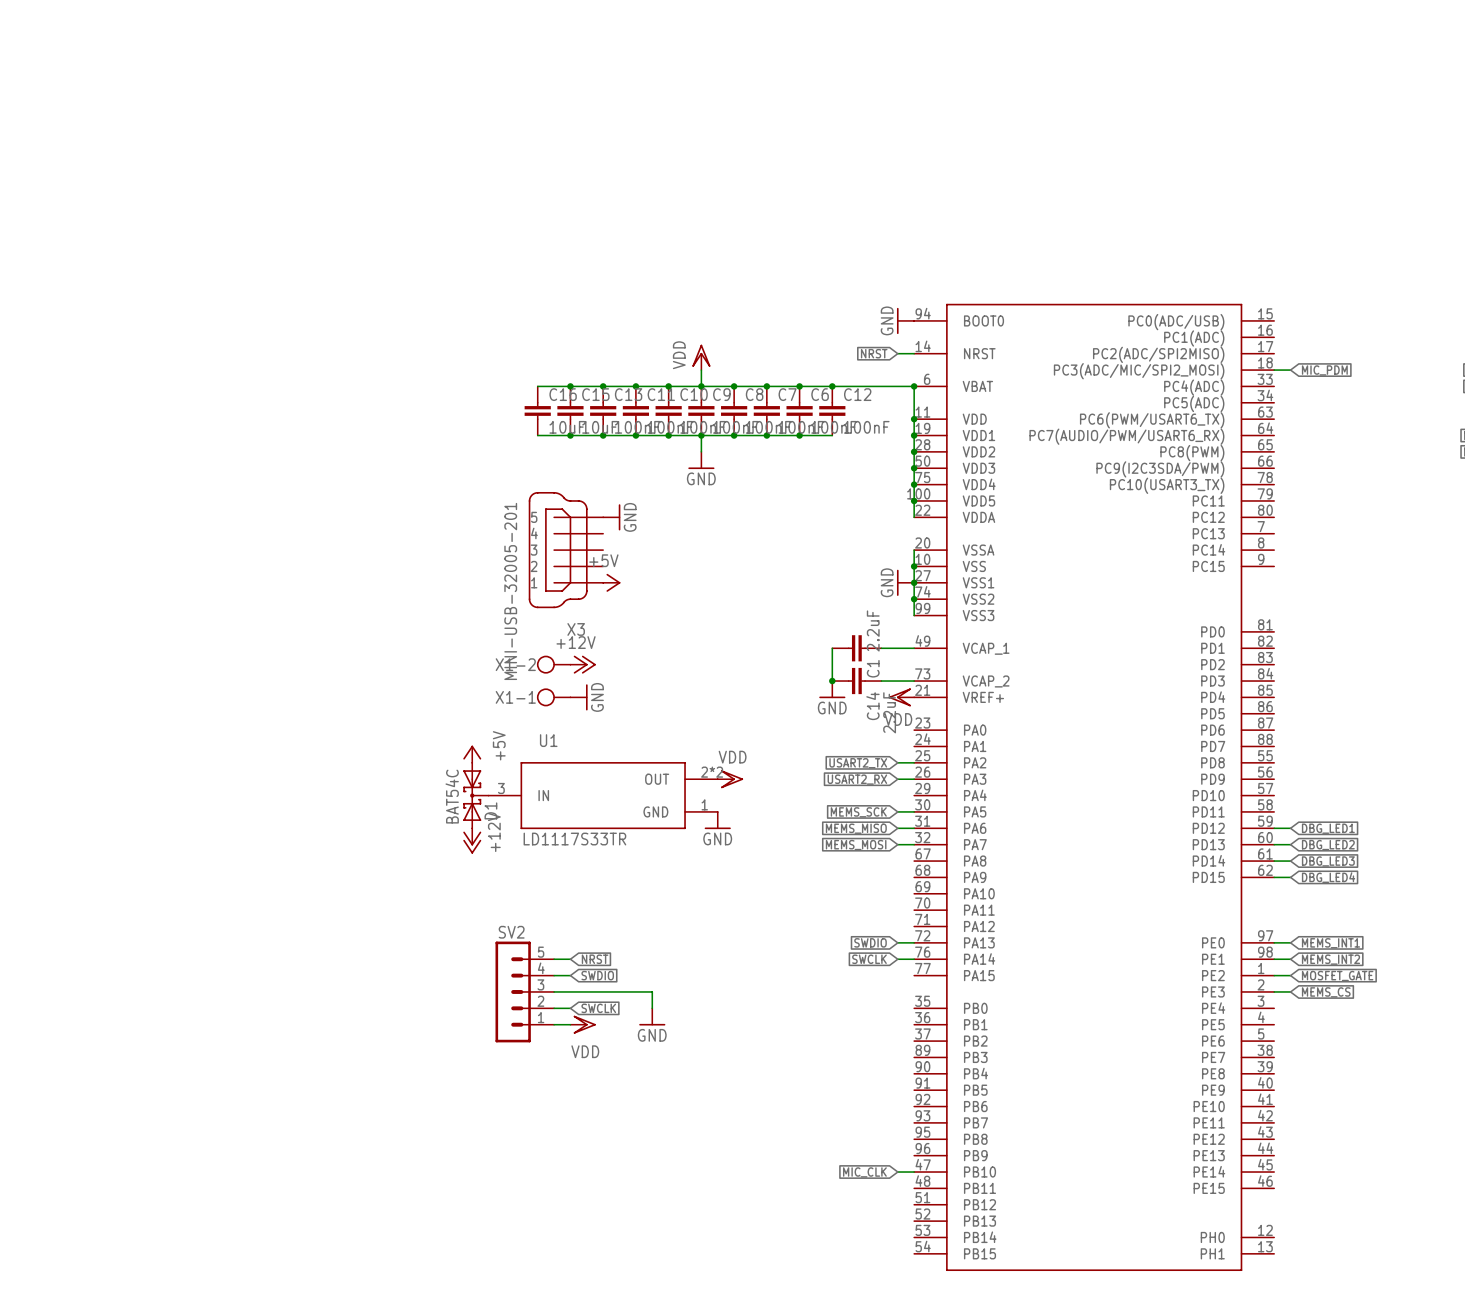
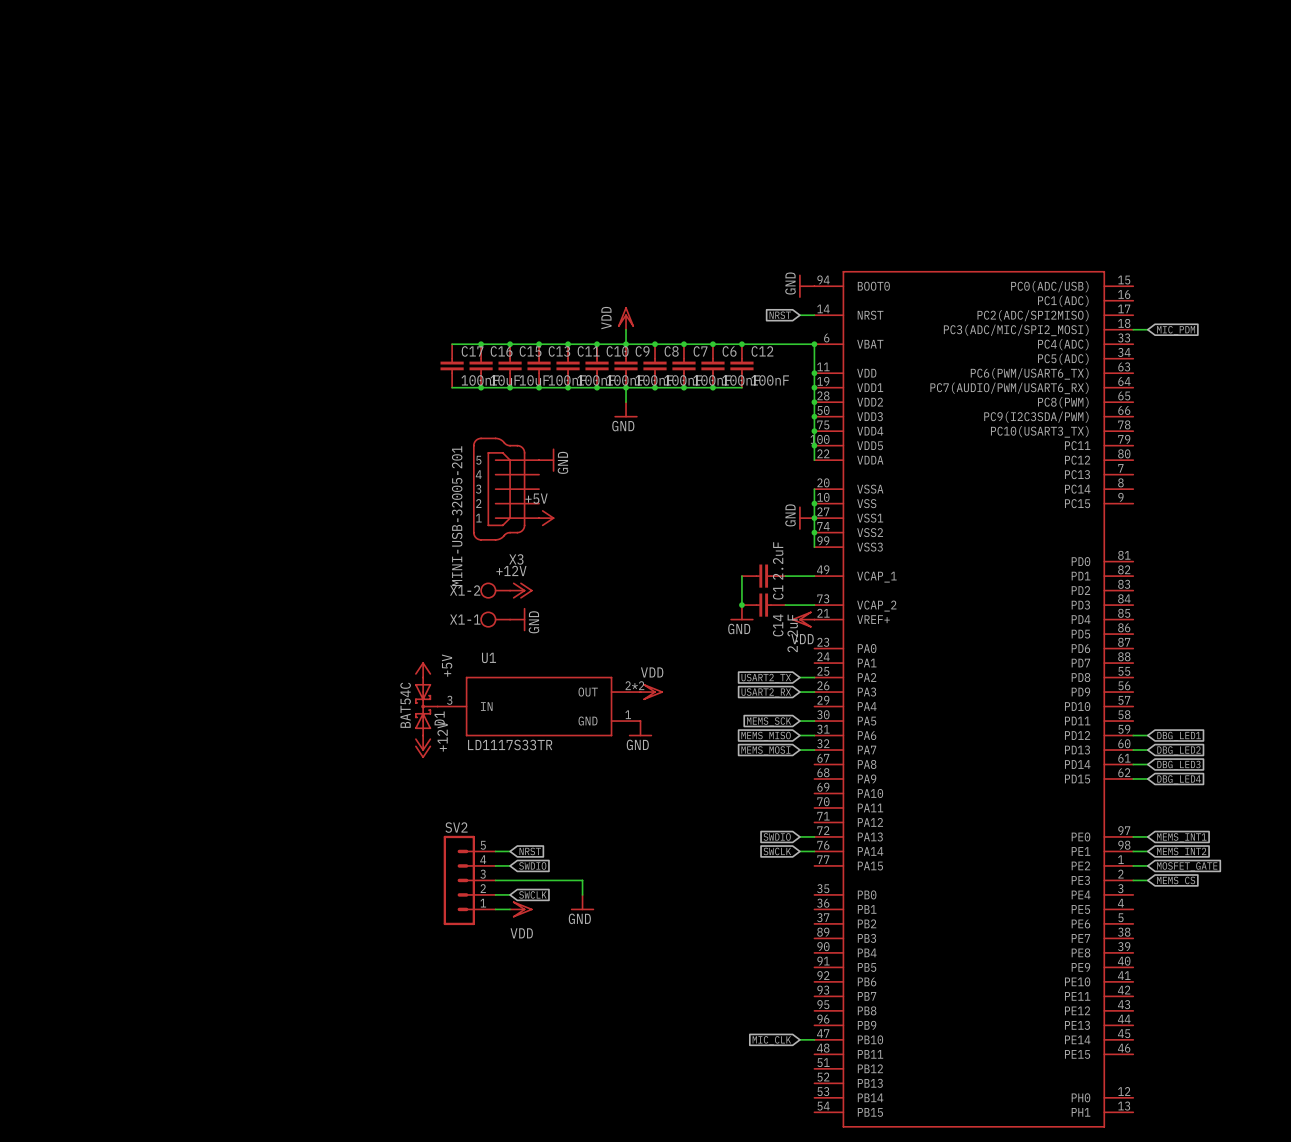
wire: none -> (452, 344) (481, 344)
junction: none -> (481, 344)
C17: none -> 100nF (452, 365)
wire: none -> (452, 387) (481, 387)
junction: none -> (481, 387)

